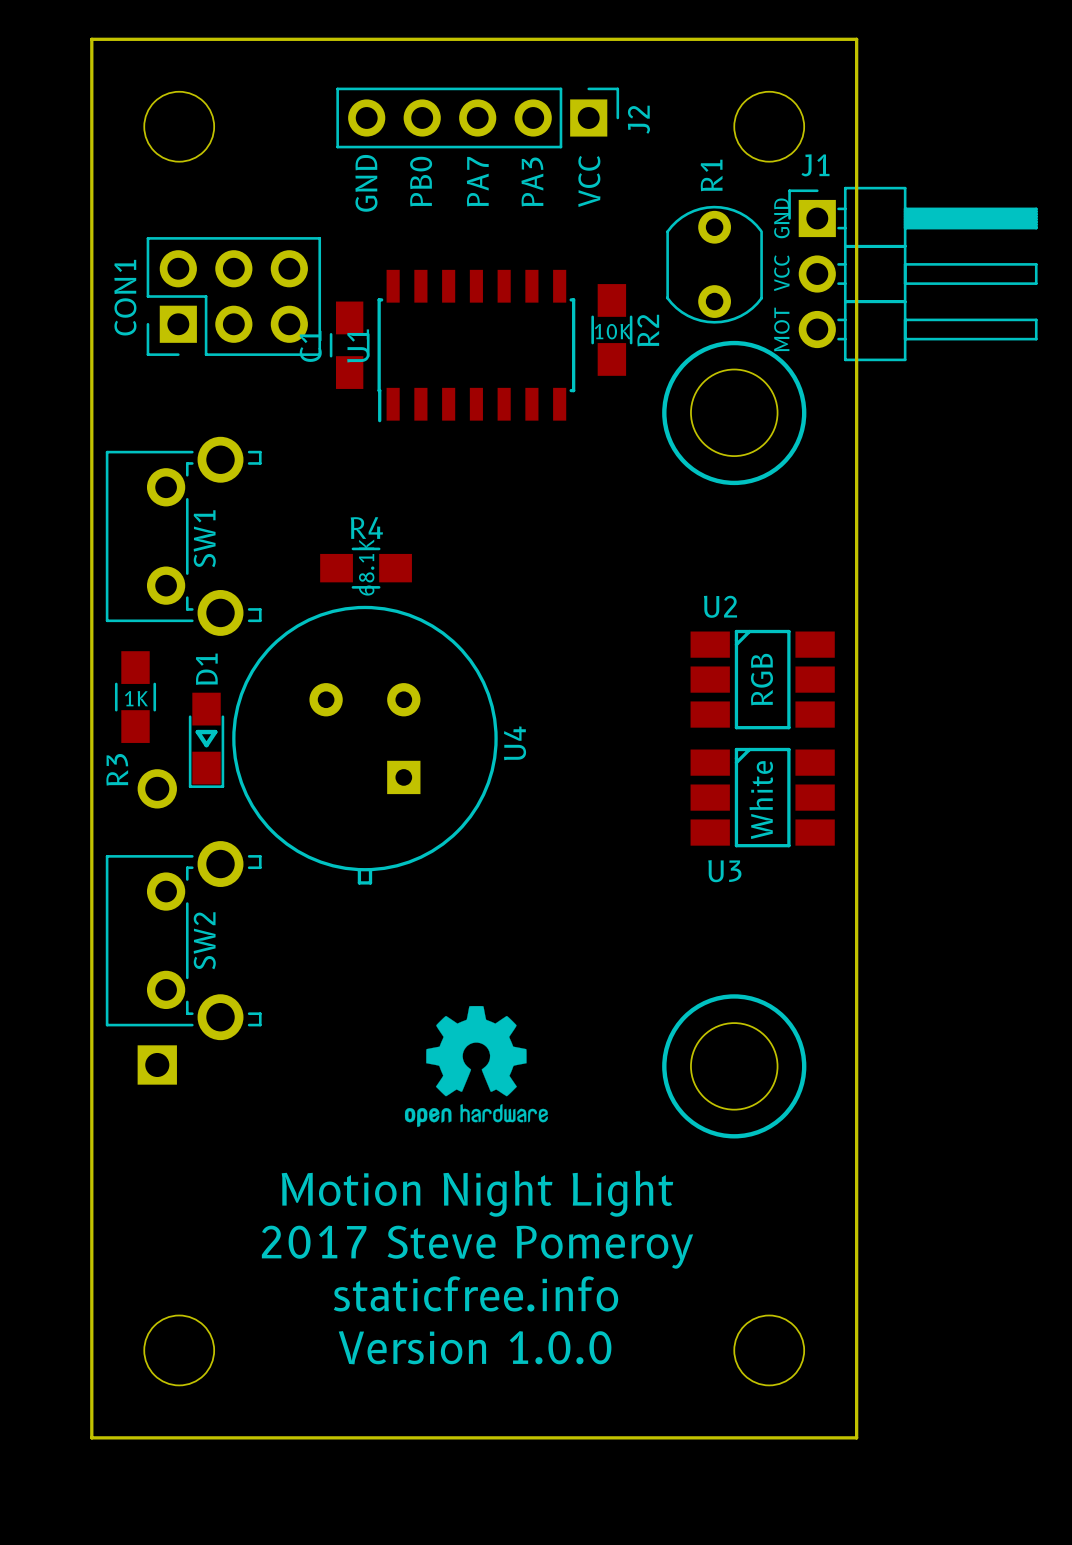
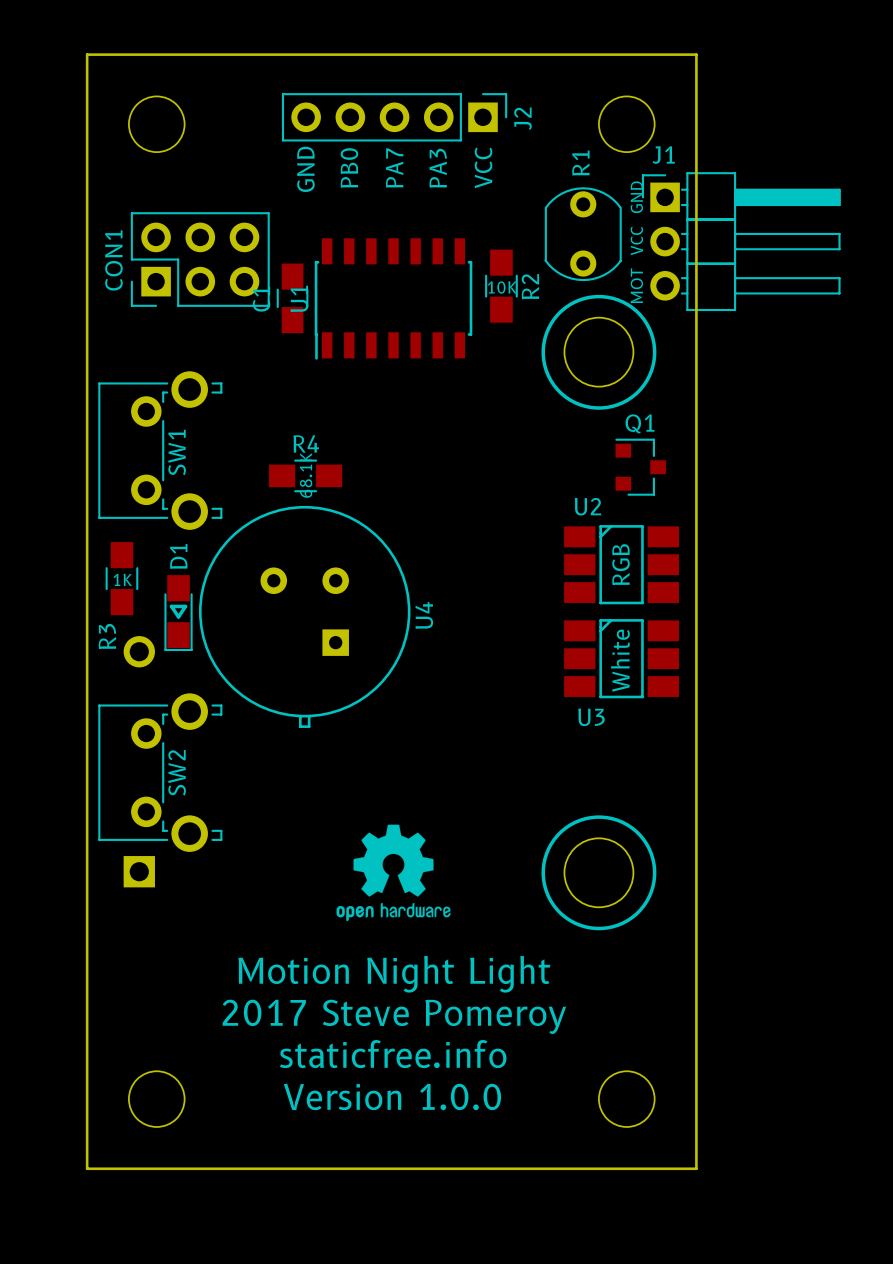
Q1: none -> (640, 467)

